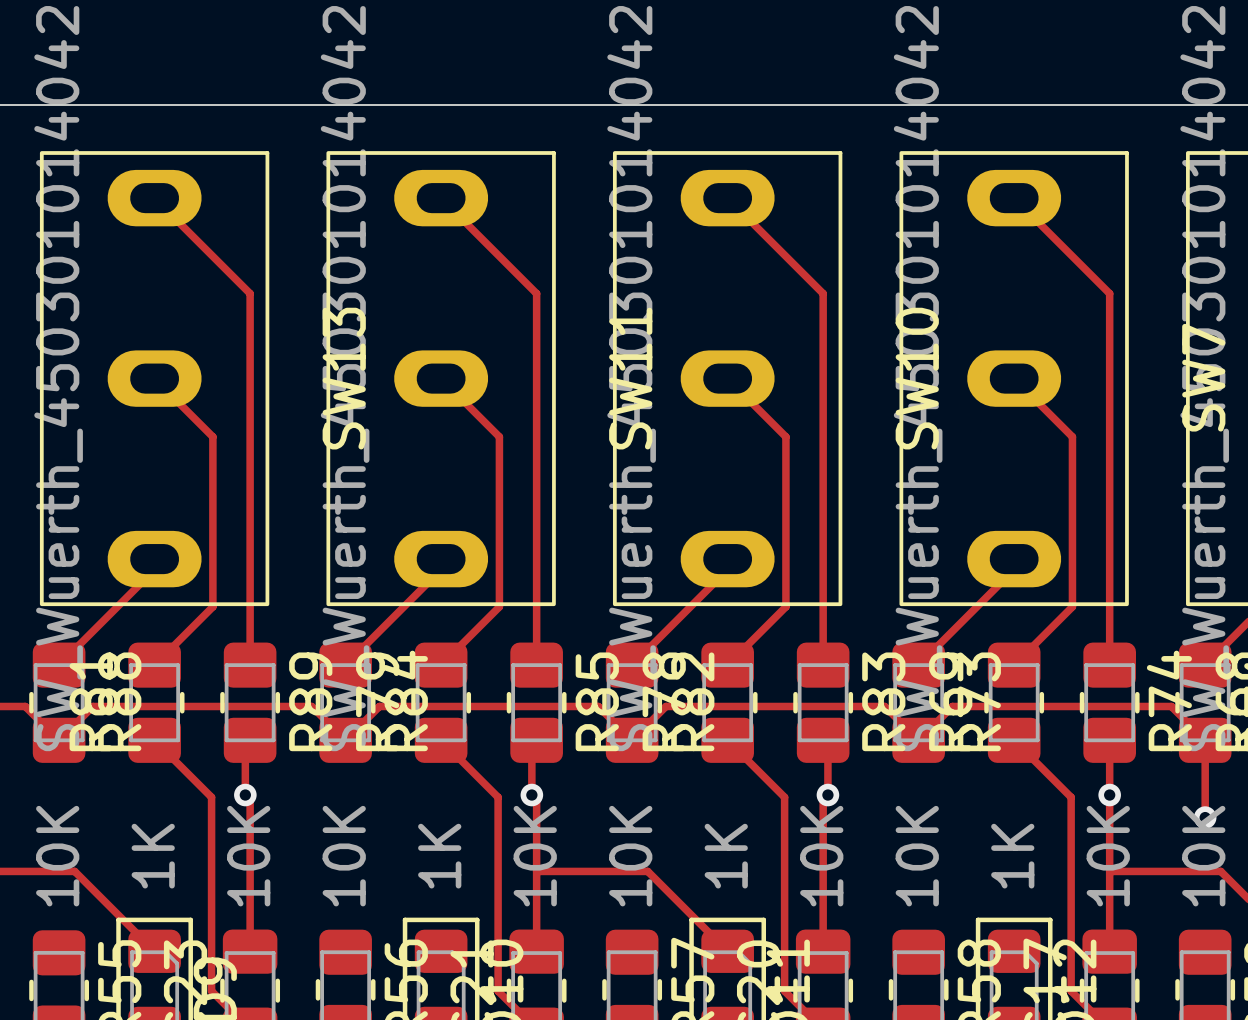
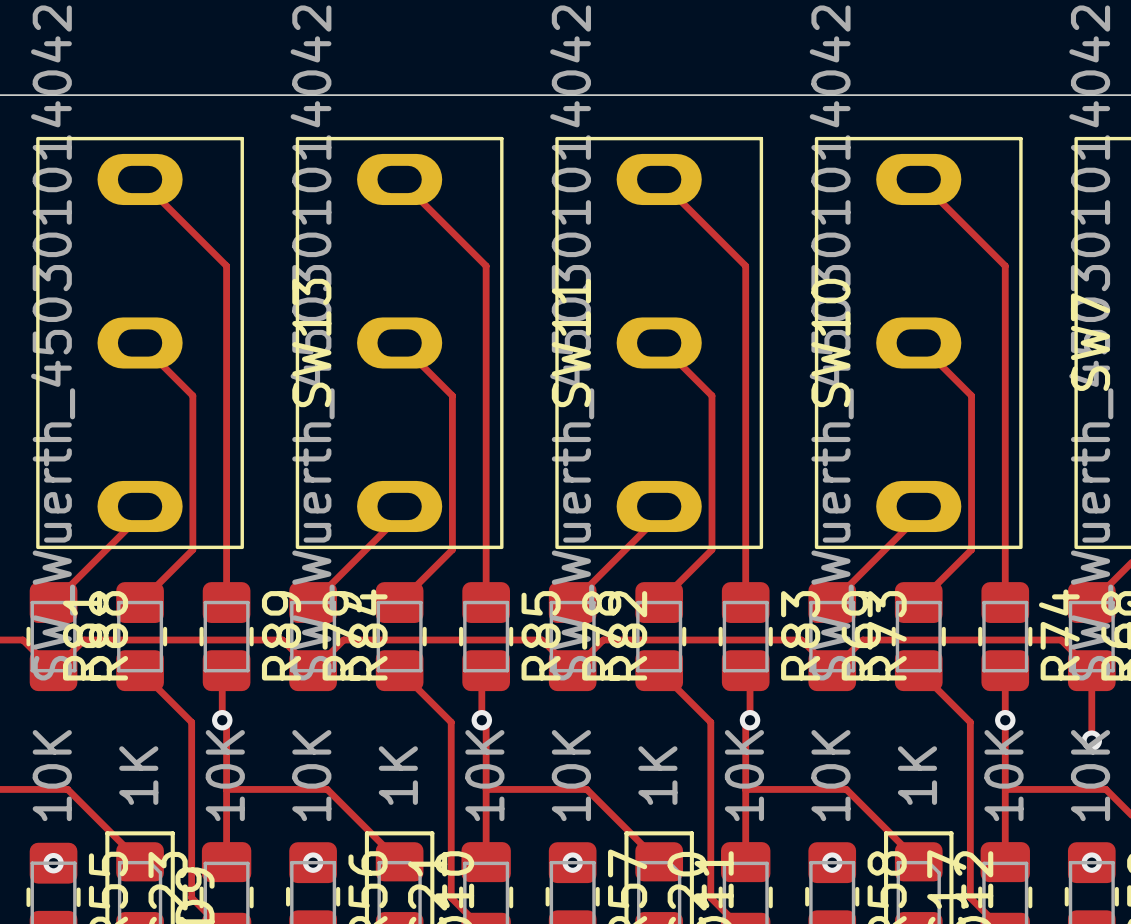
track: none -> (226, 789) (327, 789) (399, 861)
track: none -> (745, 789) (846, 789) (918, 861)
via: none -> (53, 863)
via: none -> (313, 862)
via: none -> (572, 862)
via: none -> (832, 862)
via: none -> (1091, 862)

